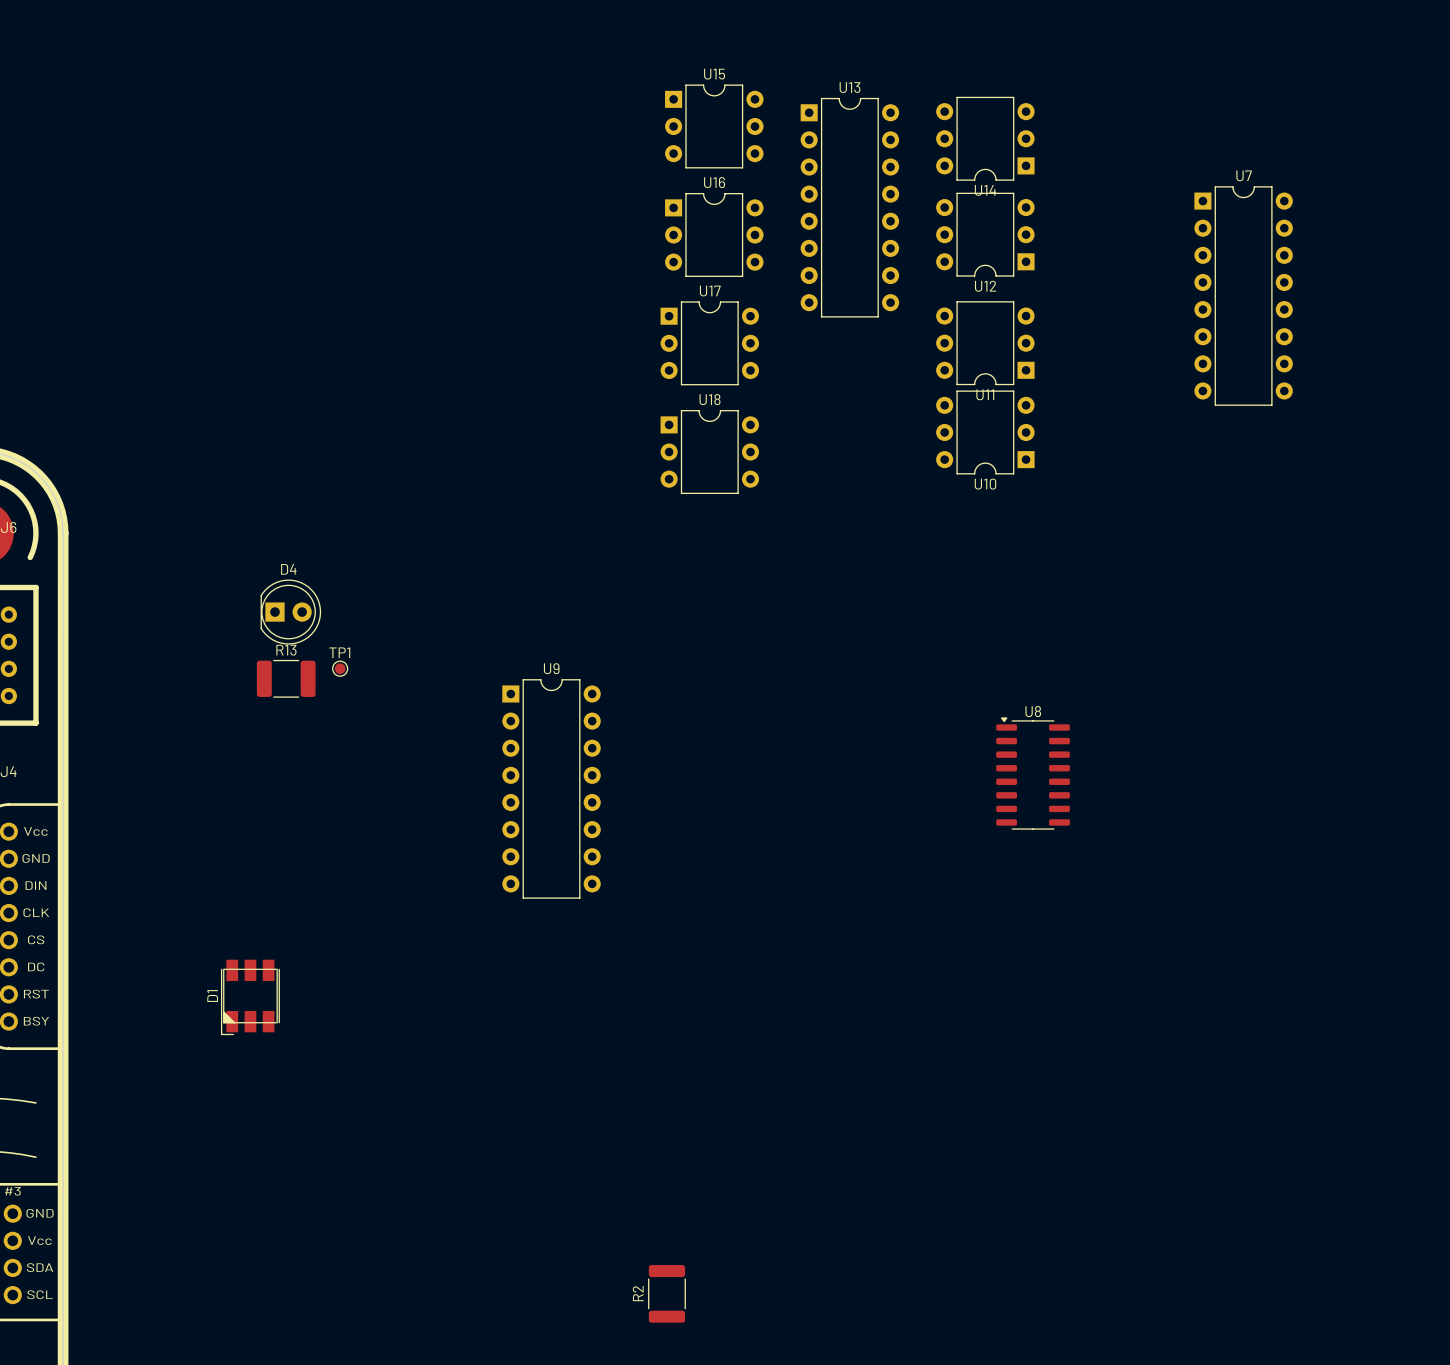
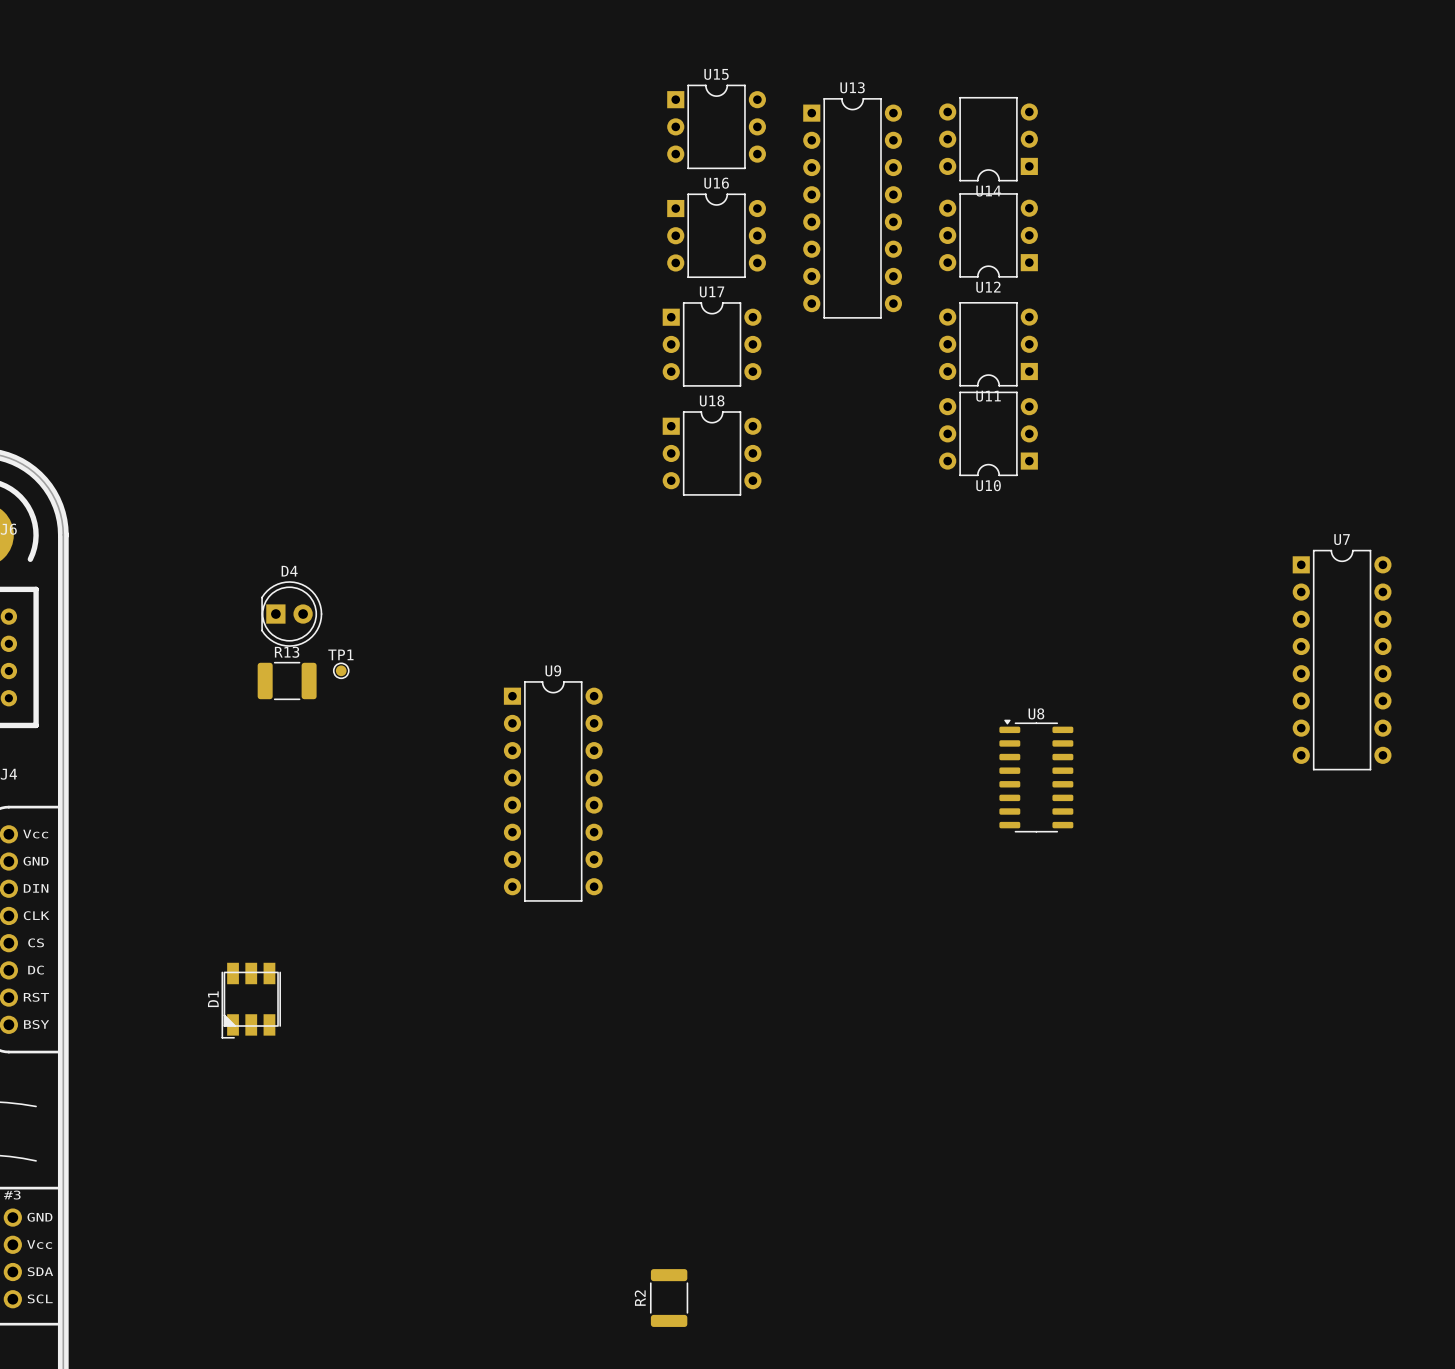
U7 position: (1243, 296) -> (1342, 660)

